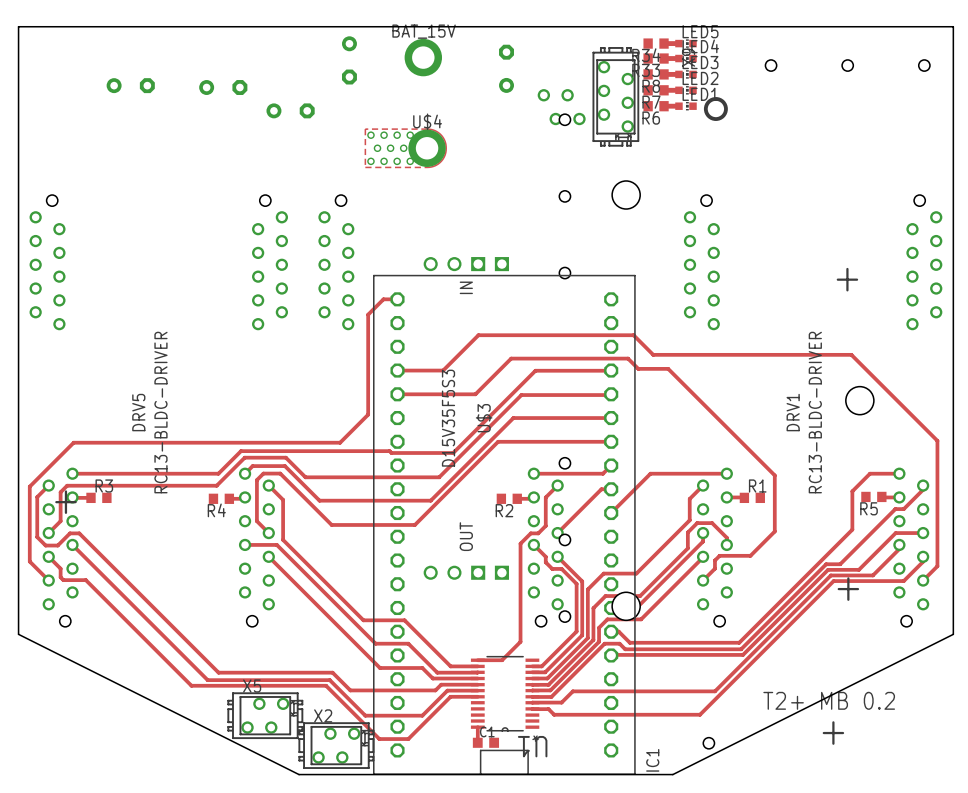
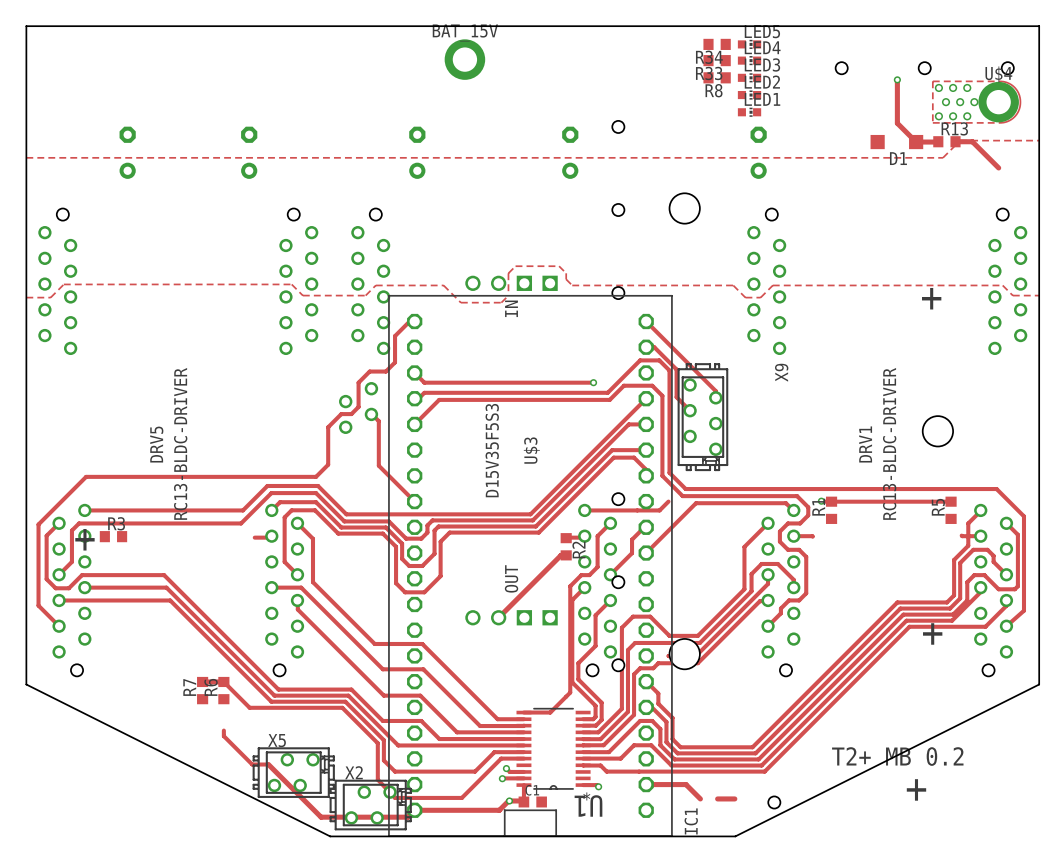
track: (664, 43) (678, 43) -> none
track: (664, 58) (678, 58) -> none
part: (349, 60) -> none
part: (506, 68) -> none
track: (664, 74) (678, 74) -> none
track: none -> (897, 79) (897, 123) (916, 142) (938, 141)
via: none -> (897, 79)
zone outline: none -> (932, 81) (932, 122) (1002, 122) (1012, 118) (1019, 107) (1020, 98) (1017, 91) (1012, 85) (1005, 82) (932, 81)
via: none -> (938, 87)
via: none -> (953, 87)
via: none -> (967, 87)
part: (130, 85) -> none
part: (223, 87) -> none
R7 rotation: 0° (656, 90) -> 90° clockwise (202, 690)
R7 position: (656, 90) -> (202, 690)
track: (664, 90) (678, 90) -> none
X9 position: (615, 96) -> (702, 417)
via: none -> (946, 102)
via: none -> (960, 102)
via: none -> (974, 102)
drawing: [703, 97, 728, 121] -> none
R6 rotation: 0° (656, 106) -> 90° clockwise (223, 690)
R6 position: (656, 106) -> (223, 690)
track: (664, 106) (678, 106) -> none
part: (561, 107) -> none
via: none -> (938, 116)
via: none -> (953, 116)
via: none -> (967, 116)
part: (290, 110) -> none
zone outline: (365, 129) (365, 167) (429, 167) (440, 161) (445, 153) (443, 138) (432, 129) (365, 129) -> none
zone outline: none -> (1039, 140) (960, 140) (942, 157) (26, 157)
D1: none -> (896, 142)
R13: none -> (946, 141)
track: none -> (955, 141) (972, 141) (998, 167)
via: (370, 135) -> none
via: (384, 135) -> none
via: (397, 135) -> none
via: (410, 135) -> none
part: none -> (127, 152)
part: none -> (249, 152)
part: none -> (417, 152)
part: none -> (570, 152)
part: none -> (758, 152)
via: (377, 148) -> none
via: (390, 148) -> none
via: (403, 148) -> none
U$4 position: (427, 148) -> (998, 102)
via: (370, 161) -> none
via: (384, 161) -> none
via: (397, 161) -> none
via: (410, 161) -> none
zone outline: none -> (1039, 295) (1012, 295) (1002, 285) (772, 285) (760, 297) (745, 297) (733, 285) (572, 285) (566, 279) (566, 273) (559, 266) (515, 266) (508, 273) (508, 295) (501, 302) (460, 302) (443, 285) (375, 285) (365, 295) (302, 295) (291, 284) (63, 284) (50, 297) (26, 297)
track: (397, 299) (383, 299) (368, 314) (368, 414) (340, 442) (285, 442) -> (414, 321) (409, 321) (395, 336) (395, 362) (385, 371) (369, 371) (358, 382) (358, 406) (351, 414) (341, 414) (328, 427) (328, 464) (316, 476)
track: none -> (646, 321) (715, 391) (715, 397)
track: none -> (646, 347) (654, 347) (676, 369) (676, 397) (690, 410)
track: (585, 335) (478, 335) (443, 370) (397, 370) -> (640, 360) (607, 392) (424, 392) (418, 398) (414, 398)
track: (602, 335) (633, 335) (653, 354) (851, 354) (937, 440) (937, 566) (923, 580) -> (659, 360) (669, 370) (669, 472) (685, 489) (996, 489) (1023, 516) (1023, 610) (1006, 626)
track: none -> (414, 372) (424, 382) (593, 382)
via: none -> (593, 382)
track: (570, 358) (511, 358) (475, 394) (397, 394) -> (623, 385) (609, 399) (439, 399) (414, 424)
track: (596, 358) (628, 358) (638, 368) (668, 368) (774, 475) (774, 531) (750, 555) (719, 555) (714, 560) (714, 564) -> (652, 385) (662, 395) (662, 475) (682, 496) (797, 496) (808, 507) (808, 515) (800, 523) (788, 523) (779, 531) (779, 541) (788, 549) (799, 549) (806, 556) (806, 593) (799, 600) (789, 600) (780, 608)
track: (611, 370) (535, 370) (453, 453) (287, 451) -> none
part: none -> (358, 408)
track: none -> (371, 414) (378, 421) (378, 465) (414, 501)
track: none -> (646, 424) (628, 424) (532, 520) (432, 520) (427, 525) (427, 532) (421, 538) (406, 538) (388, 521) (344, 521) (337, 514)
track: (611, 394) (521, 395) (439, 477) -> (646, 398) (530, 514) (482, 514)
track: (559, 418) (513, 418) (430, 500) (319, 500) (284, 466) -> none
track: (590, 418) (611, 418) -> none
track: none -> (646, 475) (646, 469) (634, 457) (613, 457) (538, 532) (449, 532) (440, 541) (440, 576) (424, 592) (405, 592) (396, 583) (396, 546) (382, 533) (338, 533) (315, 510) (309, 510)
track: (611, 441) (498, 441) (414, 524) (384, 524) -> (612, 450) (535, 526) (438, 526) (434, 530) (434, 553) (422, 566)
track: none -> (821, 501) (951, 501)
via: none -> (821, 501)
track: (280, 473) (331, 524) (371, 524) -> (315, 502) (341, 527) (385, 527) (402, 543) (402, 558) (409, 566)
track: (726, 473) (650, 473) (611, 513) -> (793, 510) (785, 503) (696, 503) (646, 553)
track: (899, 473) (870, 473) (852, 491) (852, 529) (739, 642) (629, 642) (618, 631) (611, 631) -> (980, 510) (968, 523) (968, 545) (954, 559) (954, 595) (947, 602) (897, 602) (752, 747) (680, 747) (672, 739) (672, 717) (658, 703) (658, 693) (646, 681)
track: (305, 477) (313, 477) -> (318, 485) (346, 514)
track: (923, 485) (923, 489) (903, 509) (895, 509) (840, 564) -> (1006, 523) (1017, 534) (1017, 586) (1014, 589) (998, 589) (984, 575) (974, 575) (967, 582) (967, 600) (953, 614) (936, 614)
R1 name position: R1 (757, 486) -> R1 (818, 507)
track: (611, 489) (601, 489) (577, 513) -> (646, 527) (632, 539) (632, 553)
R5 rotation: 0° (873, 496) -> 90° clockwise (951, 510)
R5 position: (873, 496) -> (951, 510)
track: (72, 497) (91, 497) -> none
R1 rotation: 0° (752, 497) -> 90° clockwise (831, 510)
R1 position: (752, 497) -> (831, 510)
R4: (221, 498) -> none
R2 rotation: 0° (509, 498) -> 90° clockwise (566, 546)
track: (689, 498) (689, 520) (636, 573) (603, 573) (587, 589) (587, 638) (546, 678) -> (753, 537) (744, 546) (744, 589) (697, 635) (669, 635) (650, 616) (633, 616) (621, 627) (621, 708) (598, 732)
R2 name position: R2 (504, 510) -> R2 (578, 550)
track: none -> (566, 555) (561, 555) (498, 617)
IC1 position: (504, 524) -> (530, 565)
track: (79, 533) (218, 672) (332, 672) (350, 690) (435, 690) (441, 684) -> (92, 575) (164, 575) (278, 689) (351, 689) (382, 720) (417, 720)
track: (923, 533) (895, 533) (858, 569) -> (1006, 574) (993, 561) (993, 555) (987, 549) (973, 549) (960, 562) (960, 598) (950, 608) (916, 608)
track: (72, 544) (207, 680) (329, 680) (365, 715) (422, 715) (447, 690) -> (84, 587) (166, 587) (274, 695) (348, 695) (398, 745) (491, 745)
track: (272, 544) (276, 544) (375, 643) (408, 643) -> (301, 587) (382, 669) (400, 669)
track: (533, 544) (545, 556) (545, 562) (552, 568) (561, 568) (576, 583) (576, 631) (543, 664) -> (584, 587) (572, 600) (572, 682) (595, 705) (595, 716)
track: (48, 556) (60, 568) (60, 577) (63, 580) (85, 580) (191, 685) (326, 685) (379, 739) -> (59, 600) (170, 600) (271, 701) (345, 701) (383, 740) (383, 760) (395, 771) (475, 771)
track: (557, 556) (582, 581) (582, 635) (544, 672) -> (610, 600) (595, 615) (595, 646) (578, 663) (578, 679) (601, 702) (601, 719) (595, 725)
track: (269, 557) (379, 668) -> (297, 600) (297, 609) (383, 695) (420, 695) (457, 732) (475, 732)
track: (703, 557) (641, 619) (607, 619) (599, 627) (599, 641) (550, 690) -> (768, 601) (759, 601) (697, 663) (658, 663) (653, 668) (640, 668) (634, 674) (634, 714) (602, 745)
track: (826, 564) (741, 649) (625, 649) (619, 643) (604, 643) (551, 696) (532, 696) -> (901, 608) (755, 753) (677, 753) (666, 742) (666, 721) (651, 707) (646, 707)
track: (340, 596) (363, 620) -> (374, 643) (422, 643) (497, 719)
track: (605, 596) (593, 608) (593, 639) (573, 659) -> (662, 642) (635, 642) (627, 650) (627, 711)
track: (384, 620) (404, 620) (450, 666) (453, 666) -> (423, 669) (448, 694)
track: none -> (202, 681) (223, 681) (249, 707) (342, 707) (377, 743) (377, 779) (395, 797) (417, 797)
track: (743, 654) (611, 655) -> (811, 706) (758, 759) (674, 759) (660, 745) (660, 729) (652, 720) (640, 720) (608, 752) (583, 752)
track: (383, 668) (422, 668) (432, 678) -> (421, 720) (439, 739) (484, 739)
track: none -> (223, 730) (223, 736) (252, 764) (268, 764) (321, 817) (408, 817) (414, 810) (499, 810) (508, 800) (523, 801)
track: (714, 691) (572, 691) (561, 702) (532, 702) -> (780, 746) (761, 765) (671, 765) (651, 745) (634, 745) (620, 758) (583, 758)
track: none -> (506, 768) (509, 771) (523, 771)
via: none -> (506, 768)
track: (432, 714) (408, 739) -> (523, 758) (501, 758) (461, 797) (448, 797)
via: none -> (502, 778)
track: none -> (523, 778) (502, 778)
track: none -> (646, 784) (686, 784) (700, 798)
track: none -> (583, 785) (596, 785) (598, 786)
via: none -> (598, 786)
track: none -> (717, 798) (734, 798)
via: none -> (509, 800)

